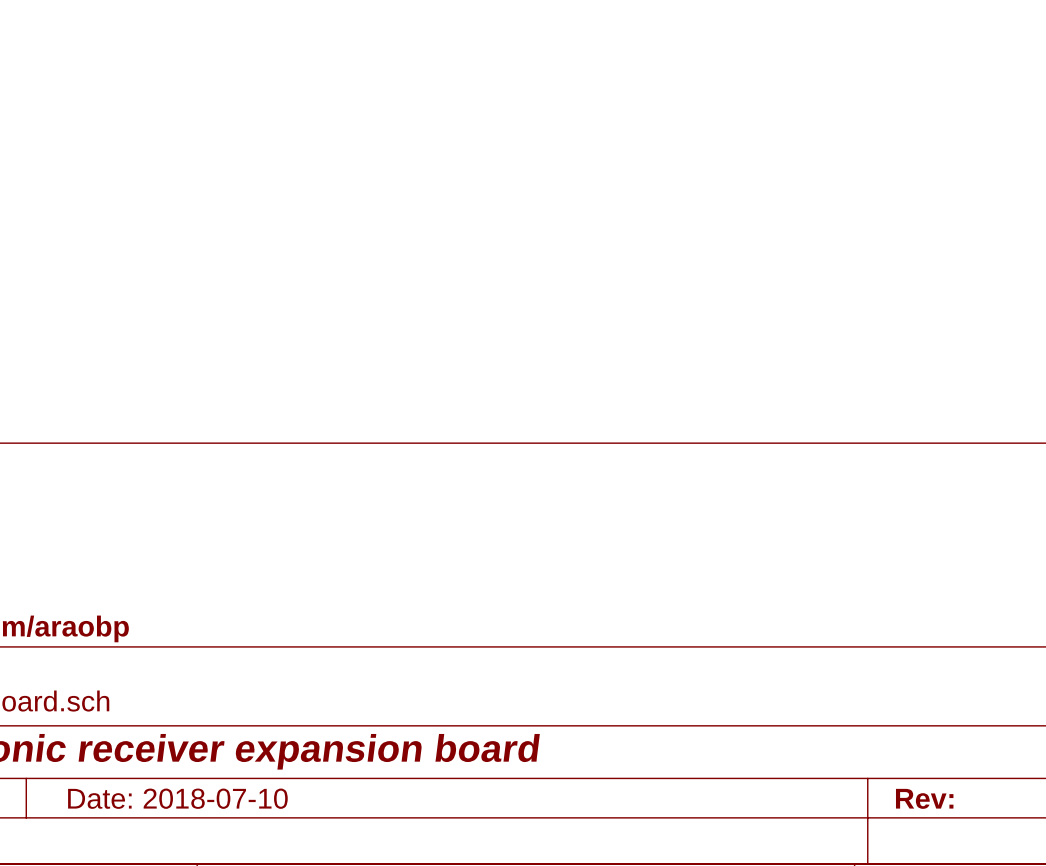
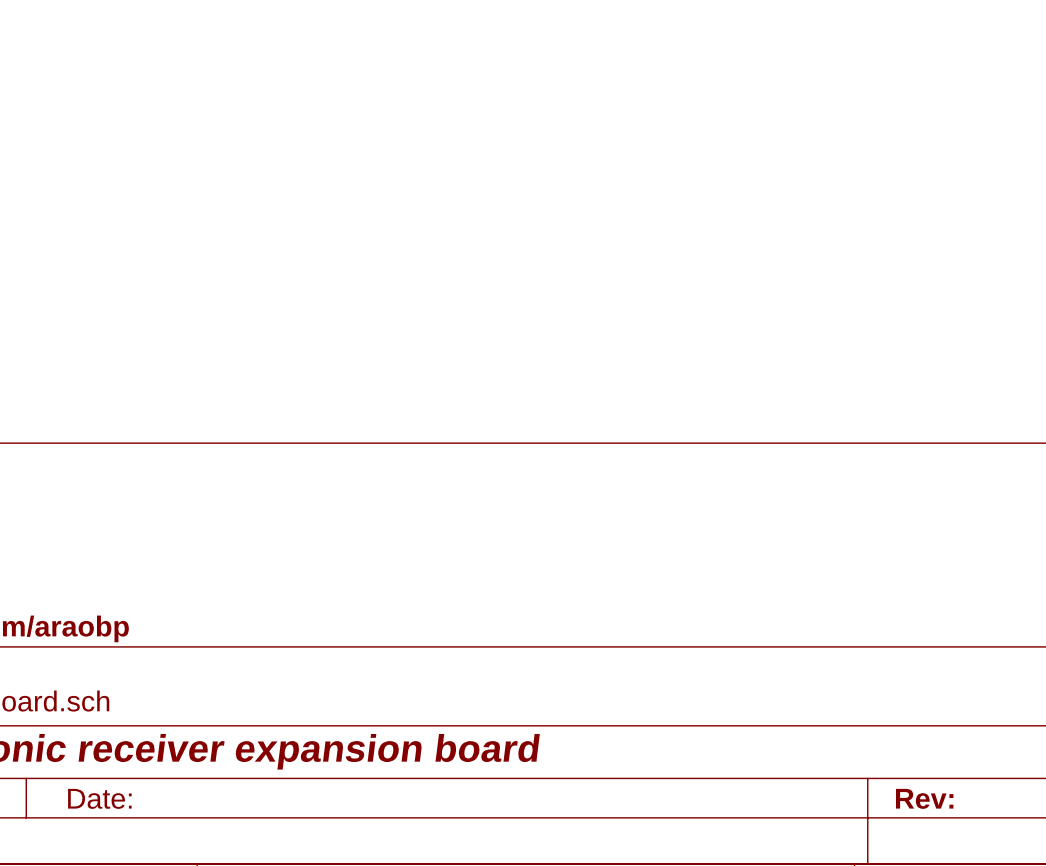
title block: Date: 2018-07-10 (177, 798) -> Date: (99, 798)

